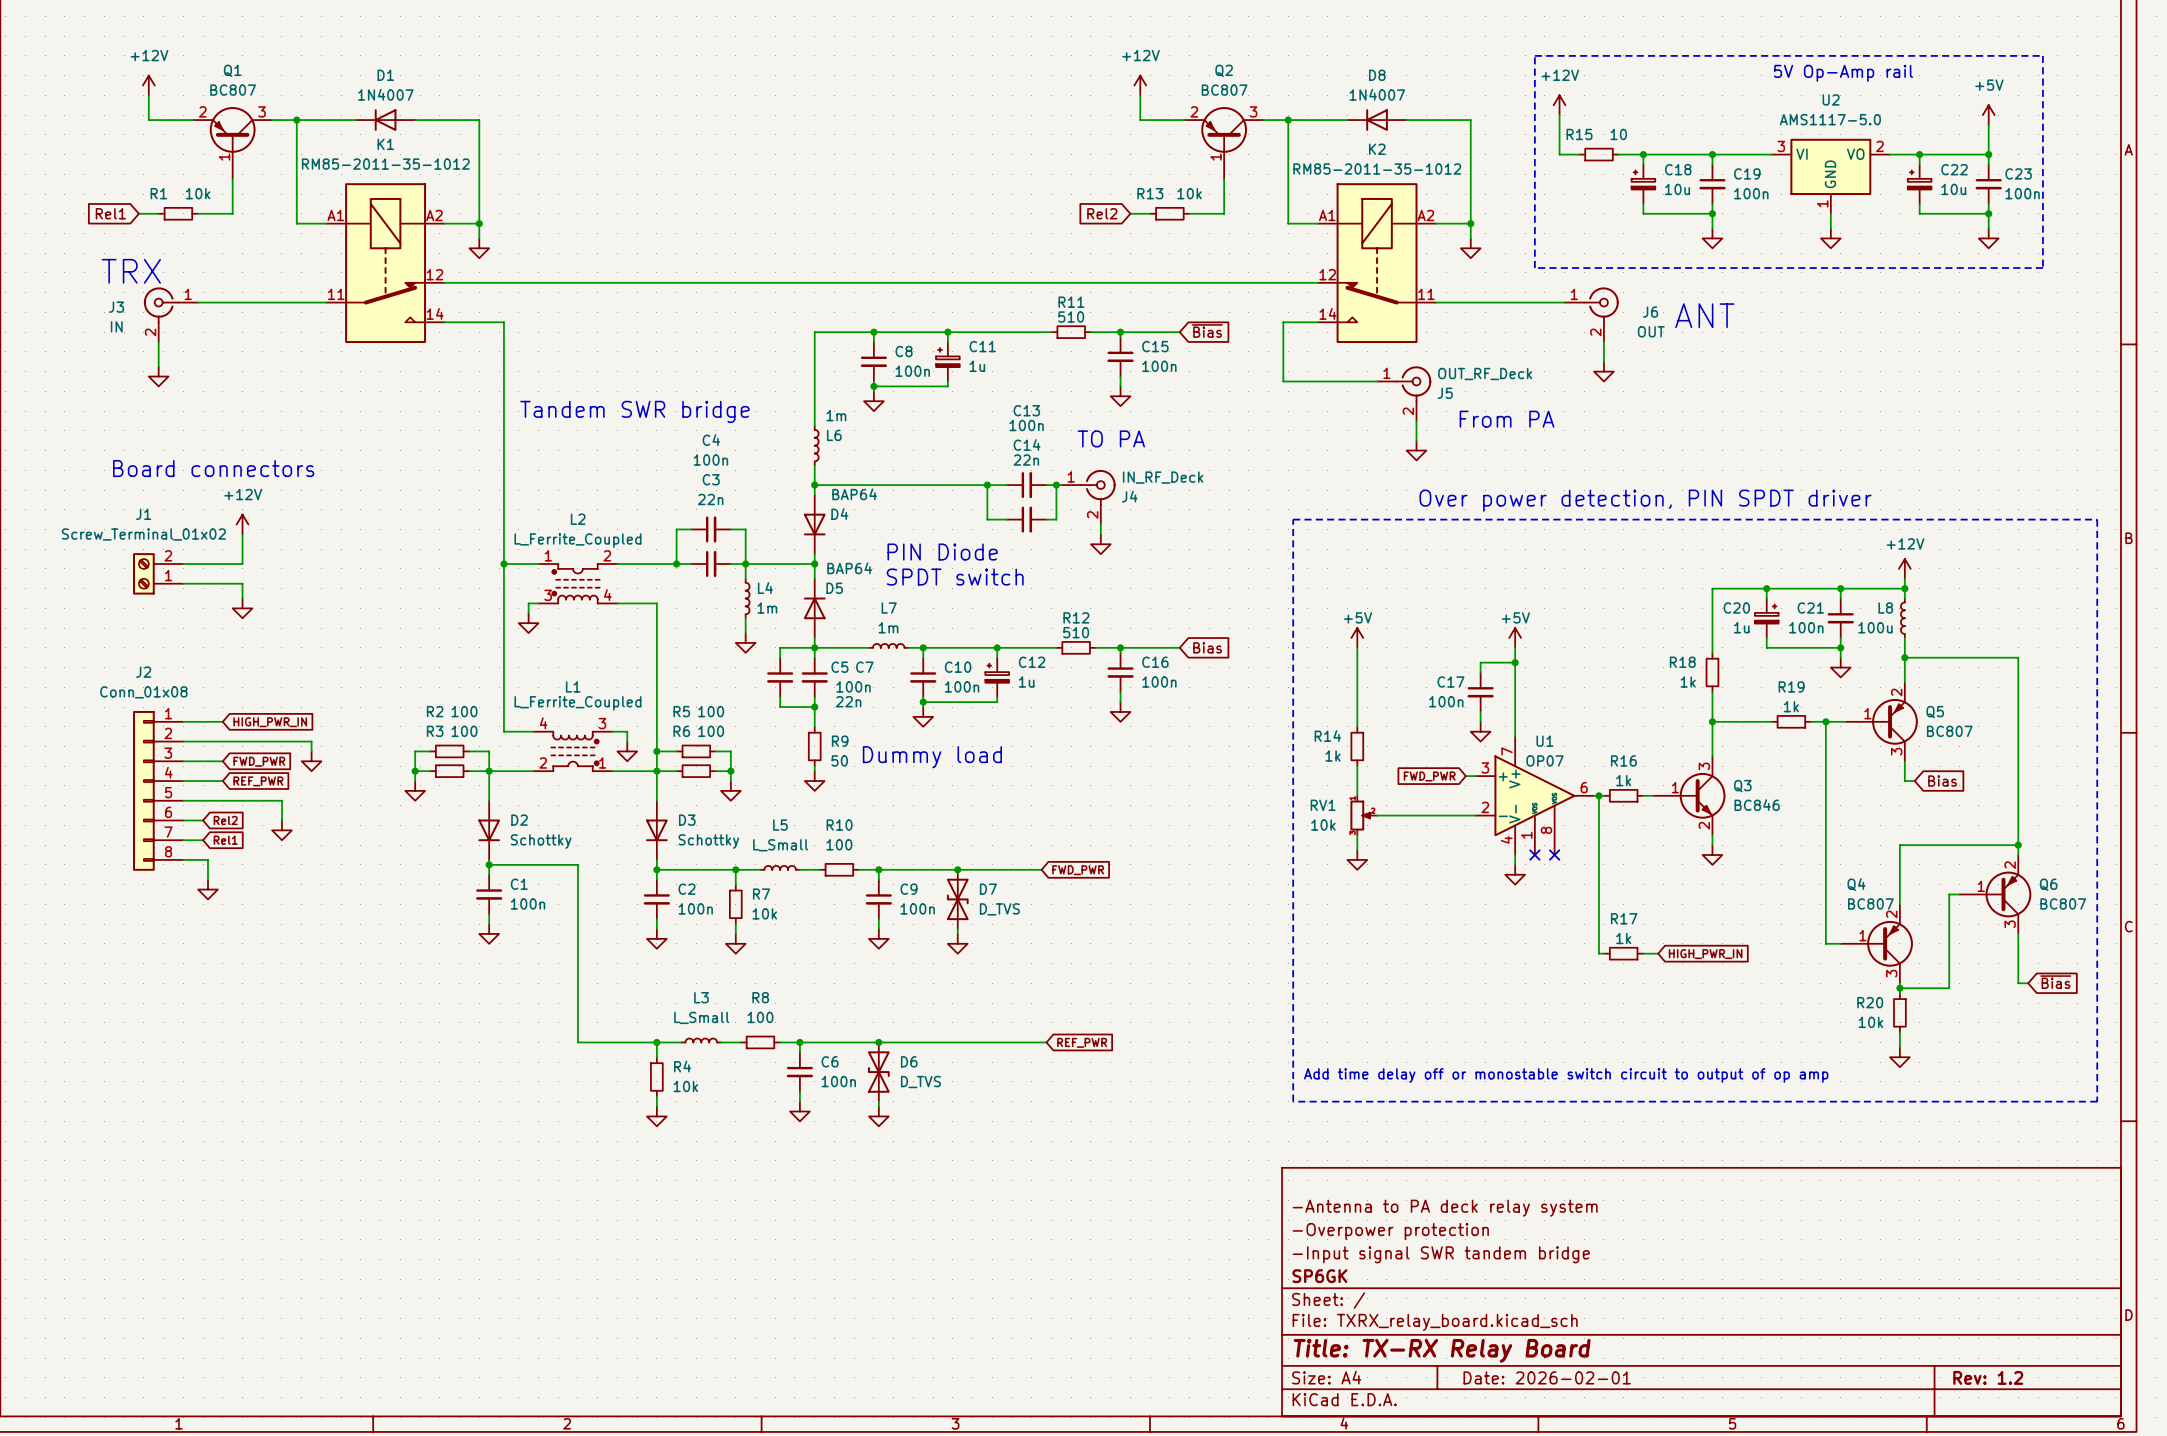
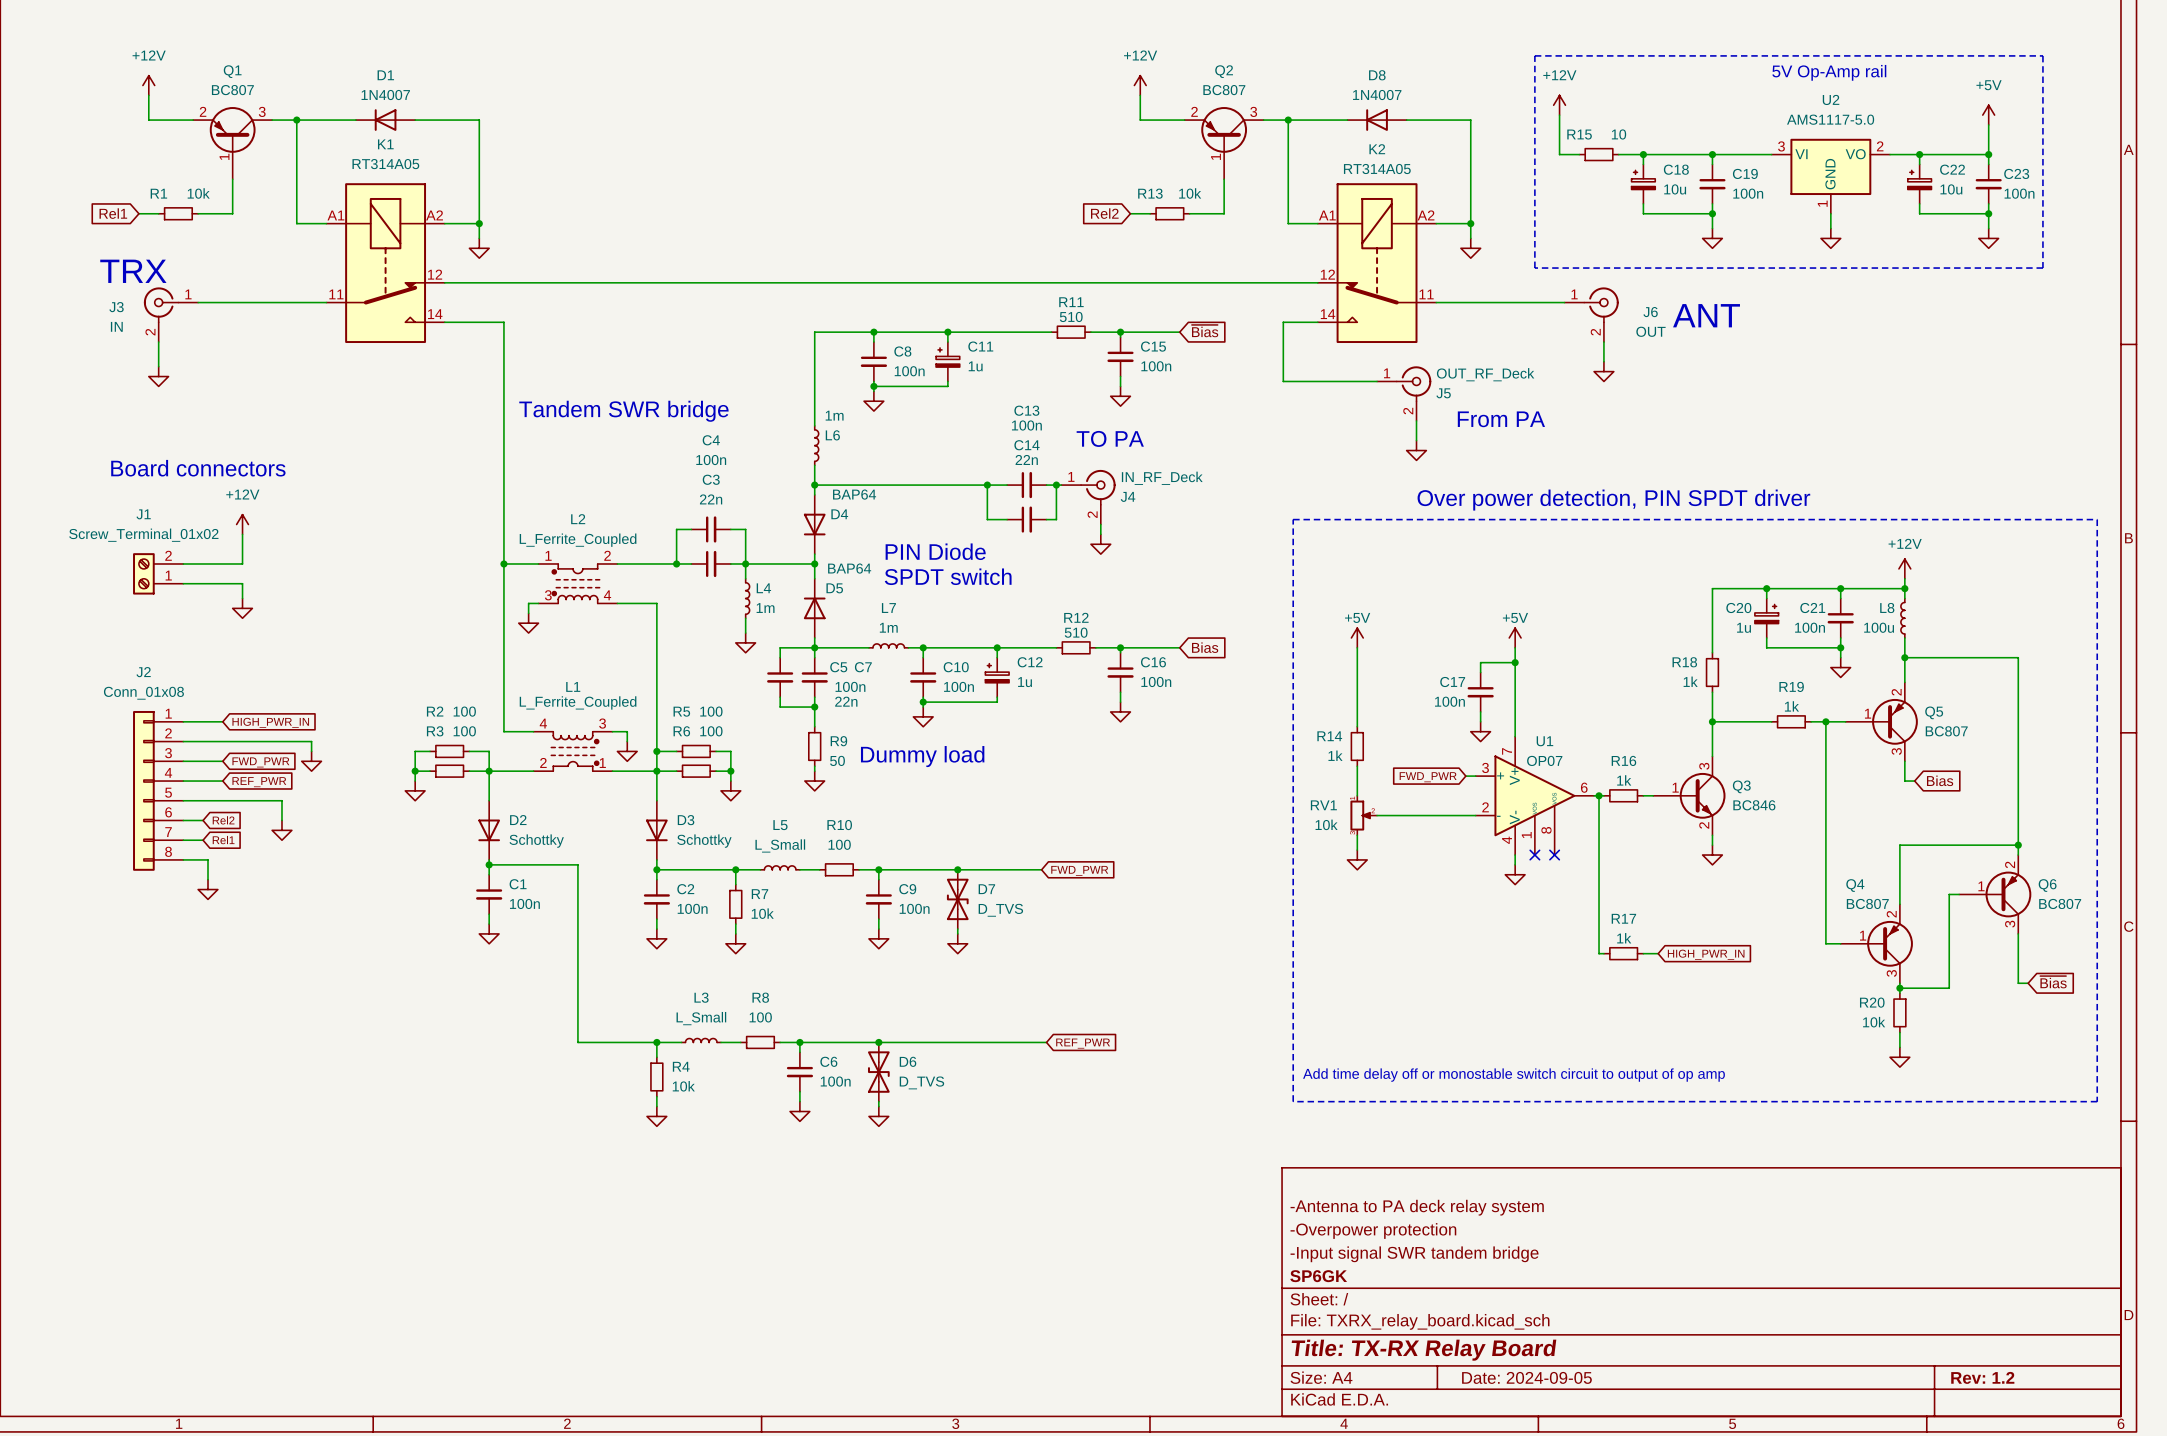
K1 value: RM85-2011-35-1012 (385, 164) -> RT314A05 (385, 164)
K2 value: RM85-2011-35-1012 (1377, 169) -> RT314A05 (1377, 169)
title block: Date: 2026-02-01 (1547, 1377) -> Date: 2024-09-05 (1526, 1377)

